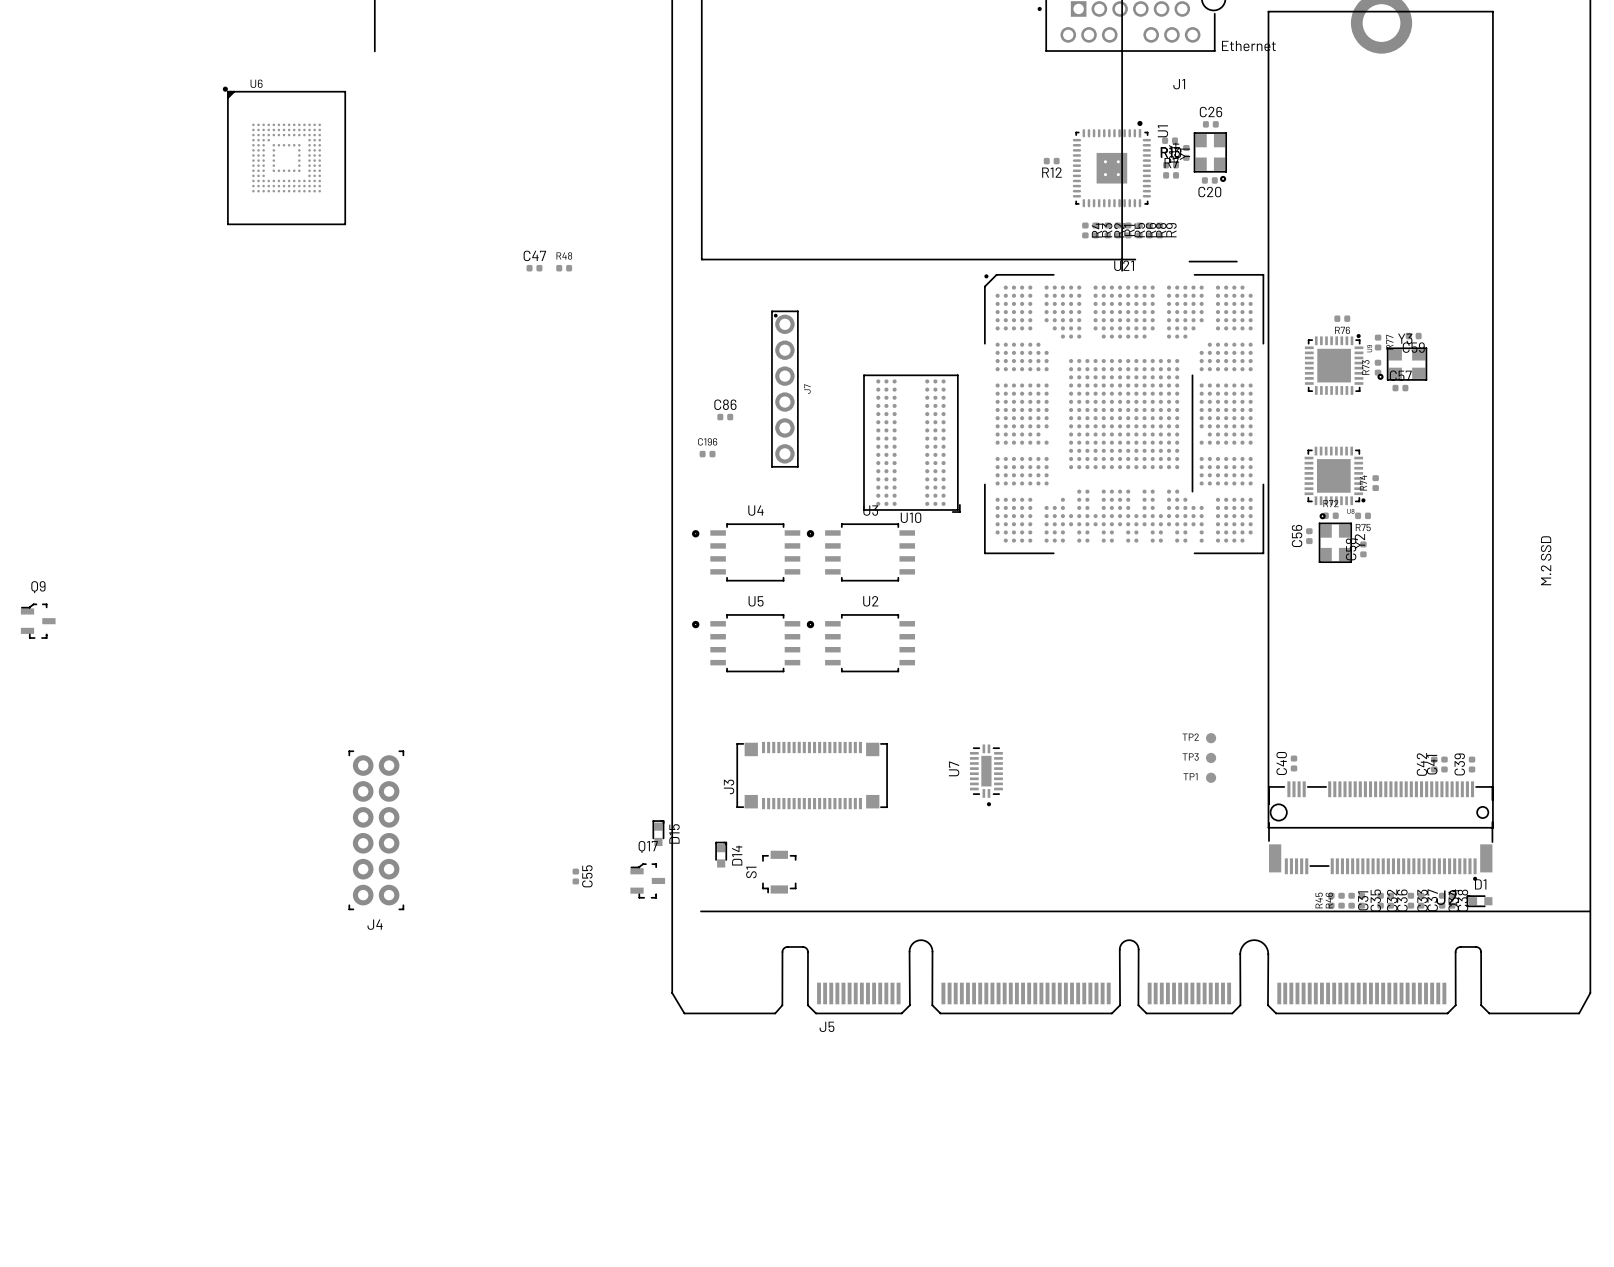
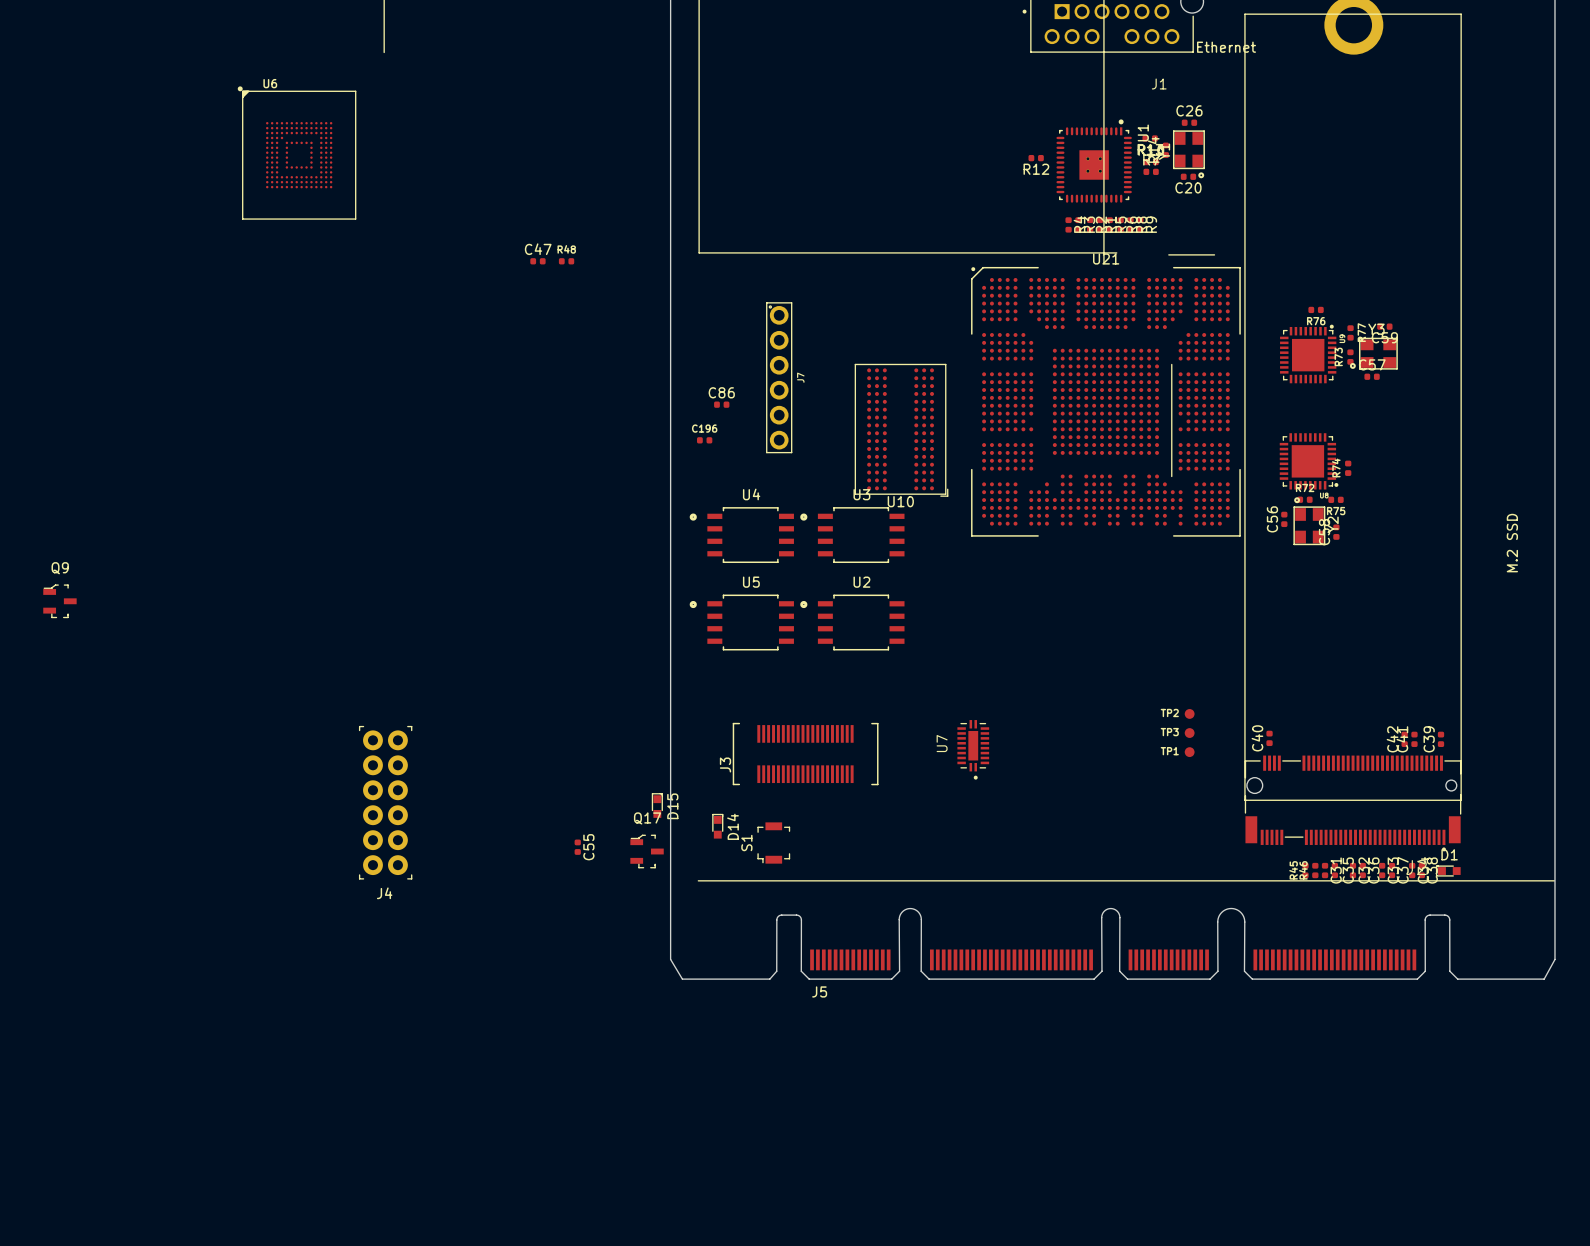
J3 footprint: [736, 741, 888, 810] -> [732, 722, 879, 786]

